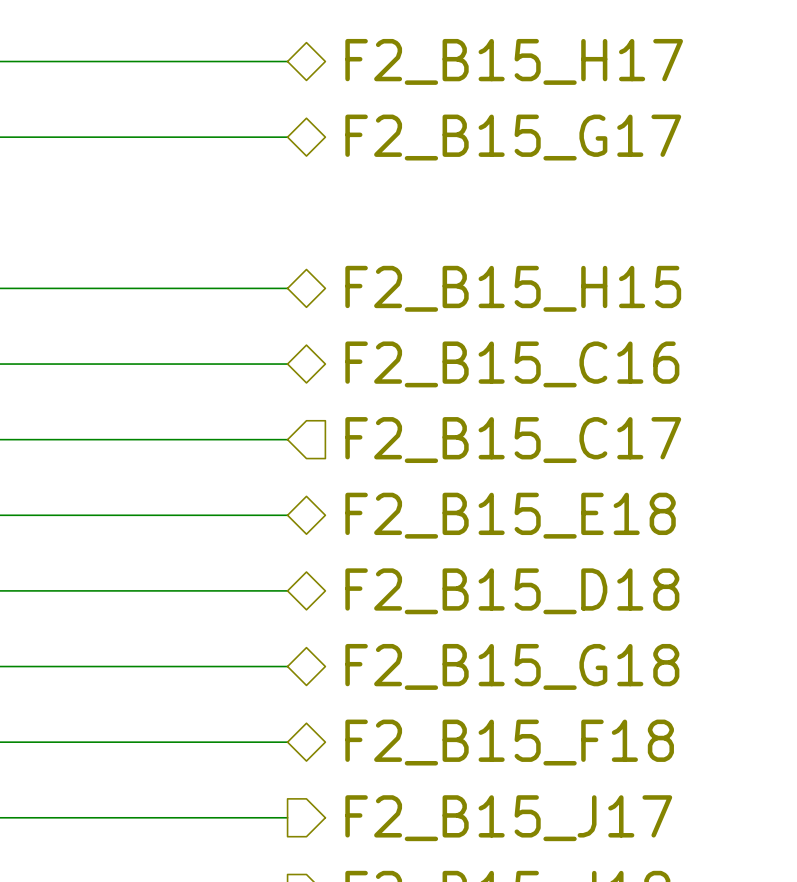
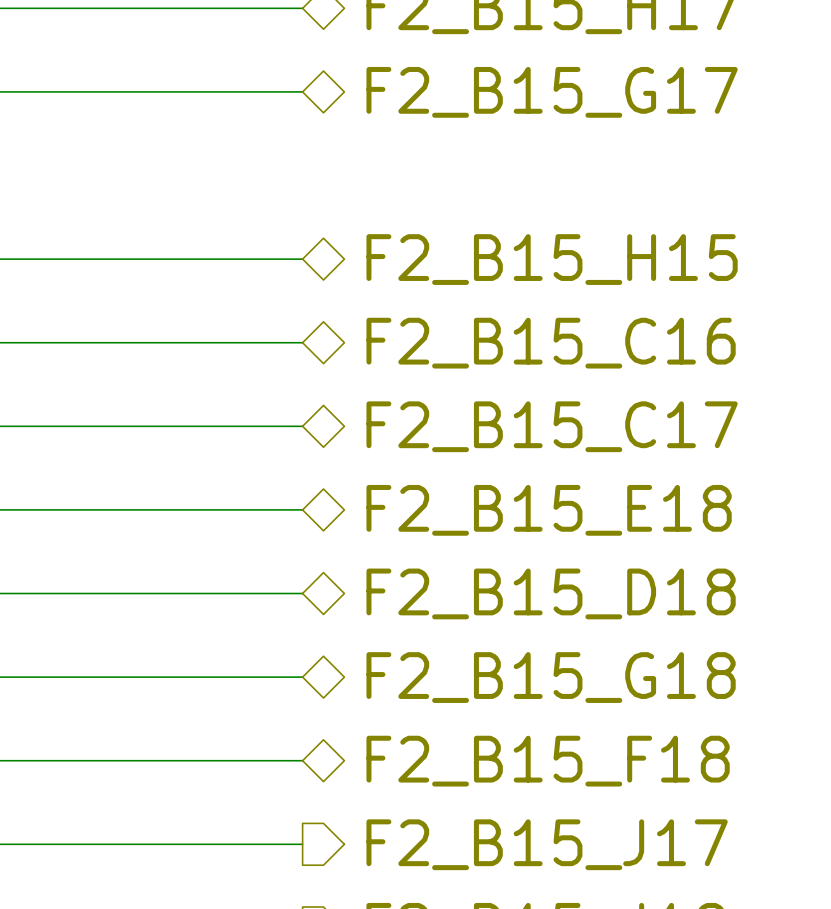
hierarchical label shape: input (513, 440) -> bidirectional (552, 426)

